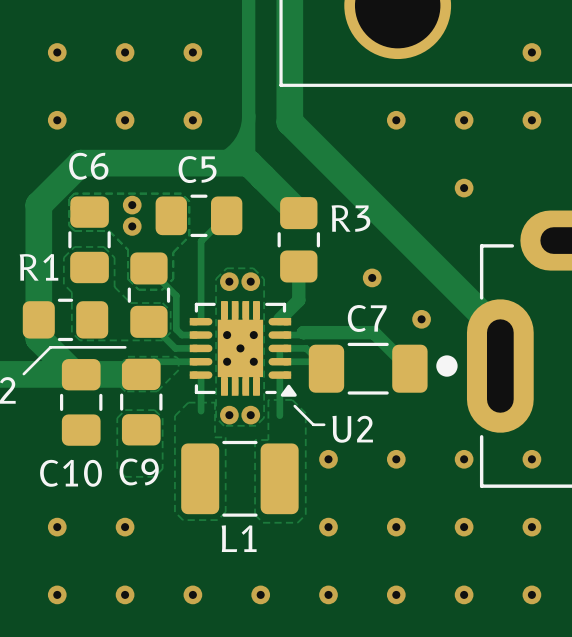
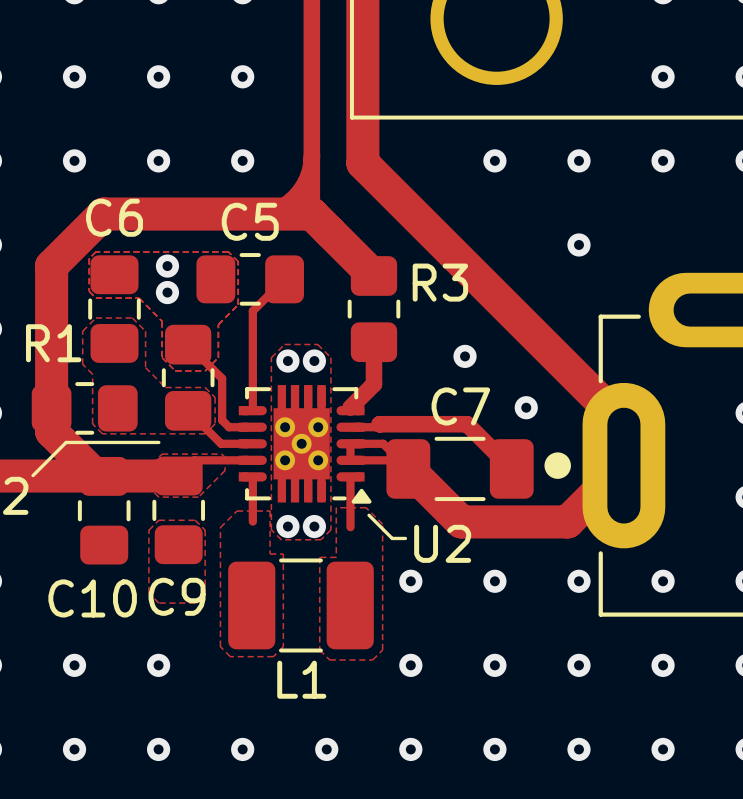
track: none -> (623, 465) (567, 521) (461, 521) (408, 468)

